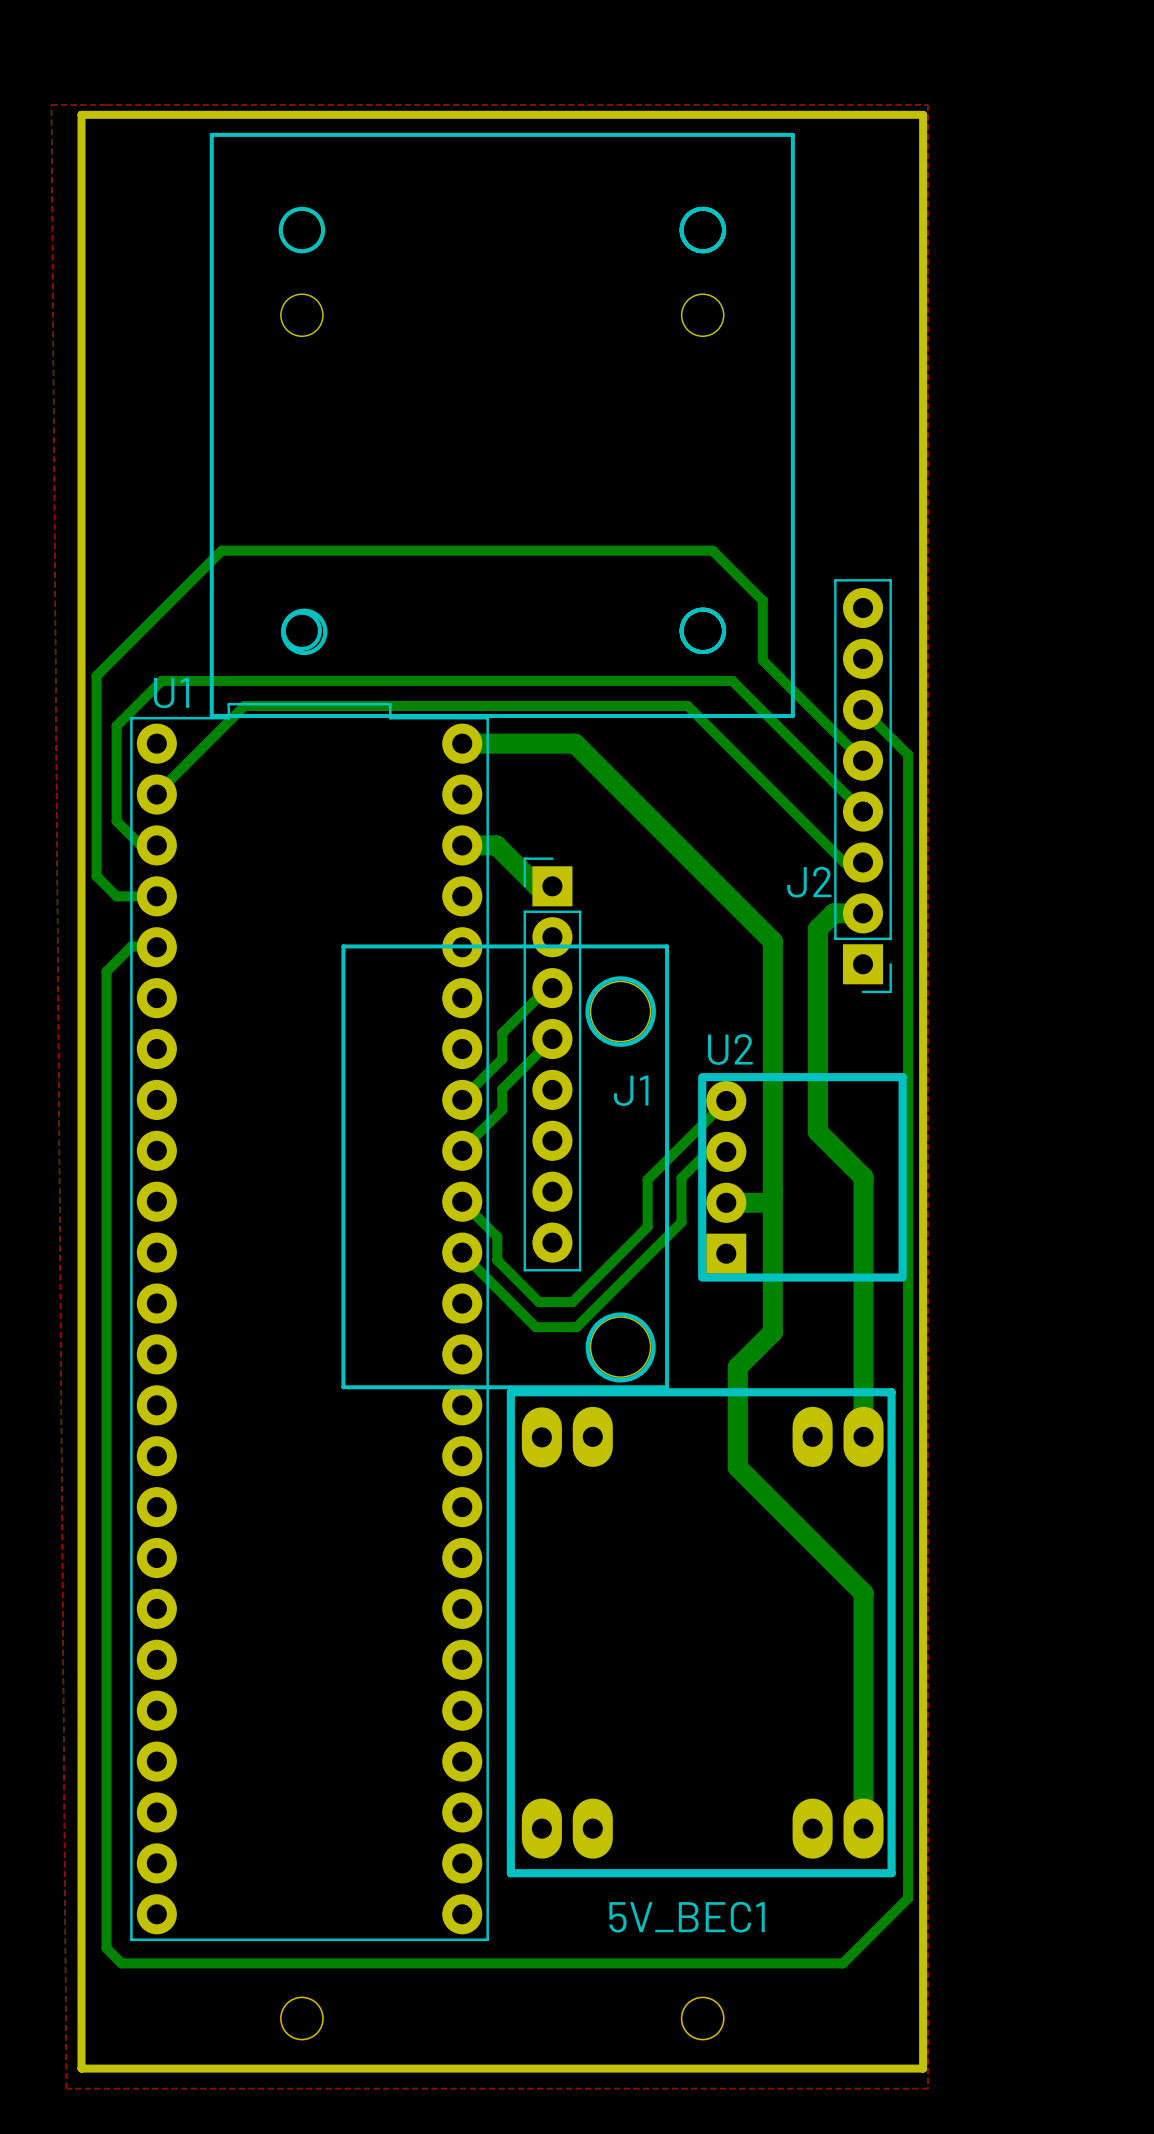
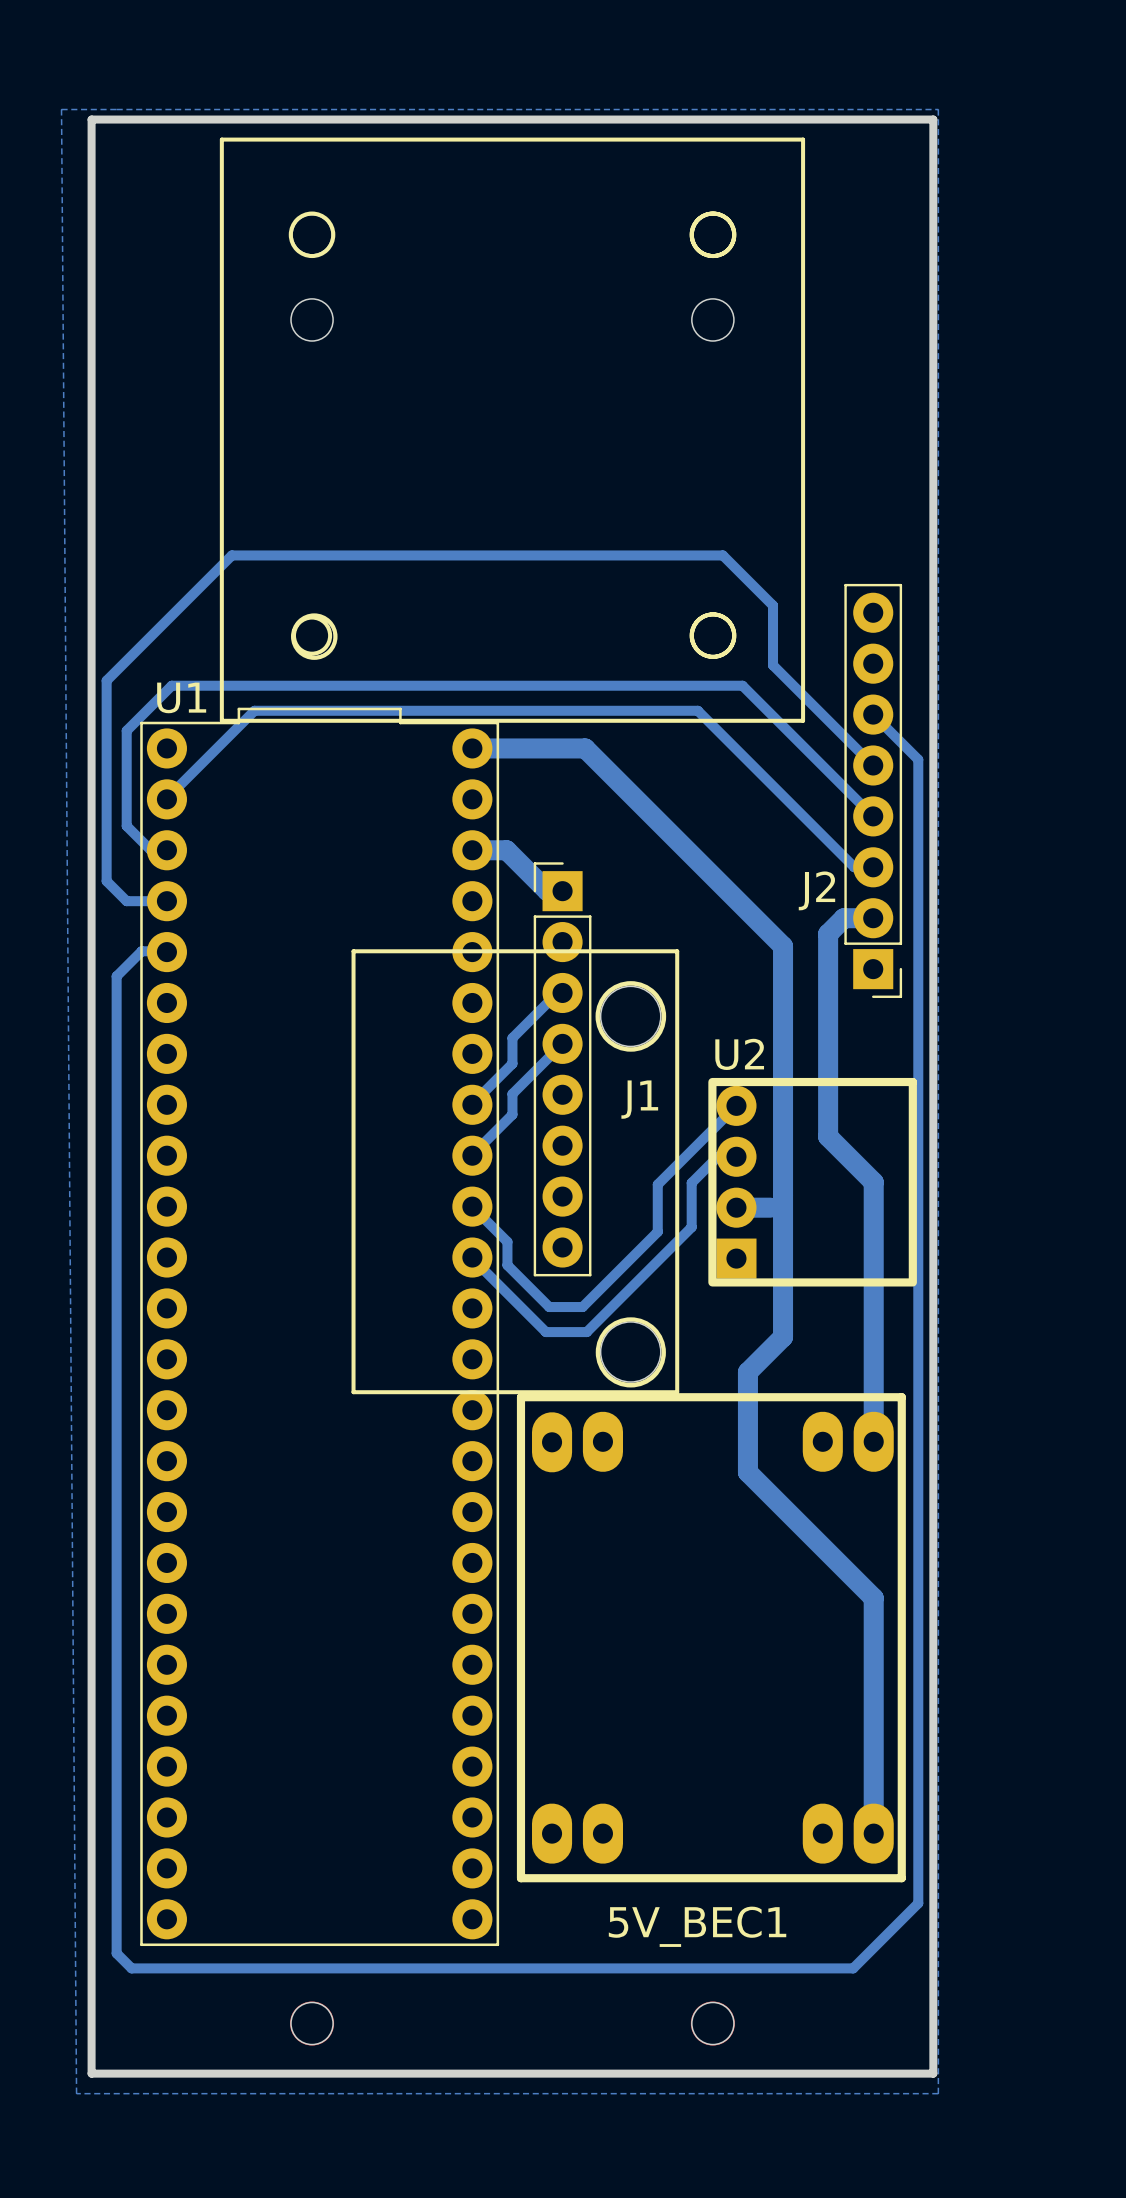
top zone outline: (51, 104) (66, 2088) (928, 2088) (928, 104) (51, 104) -> none

